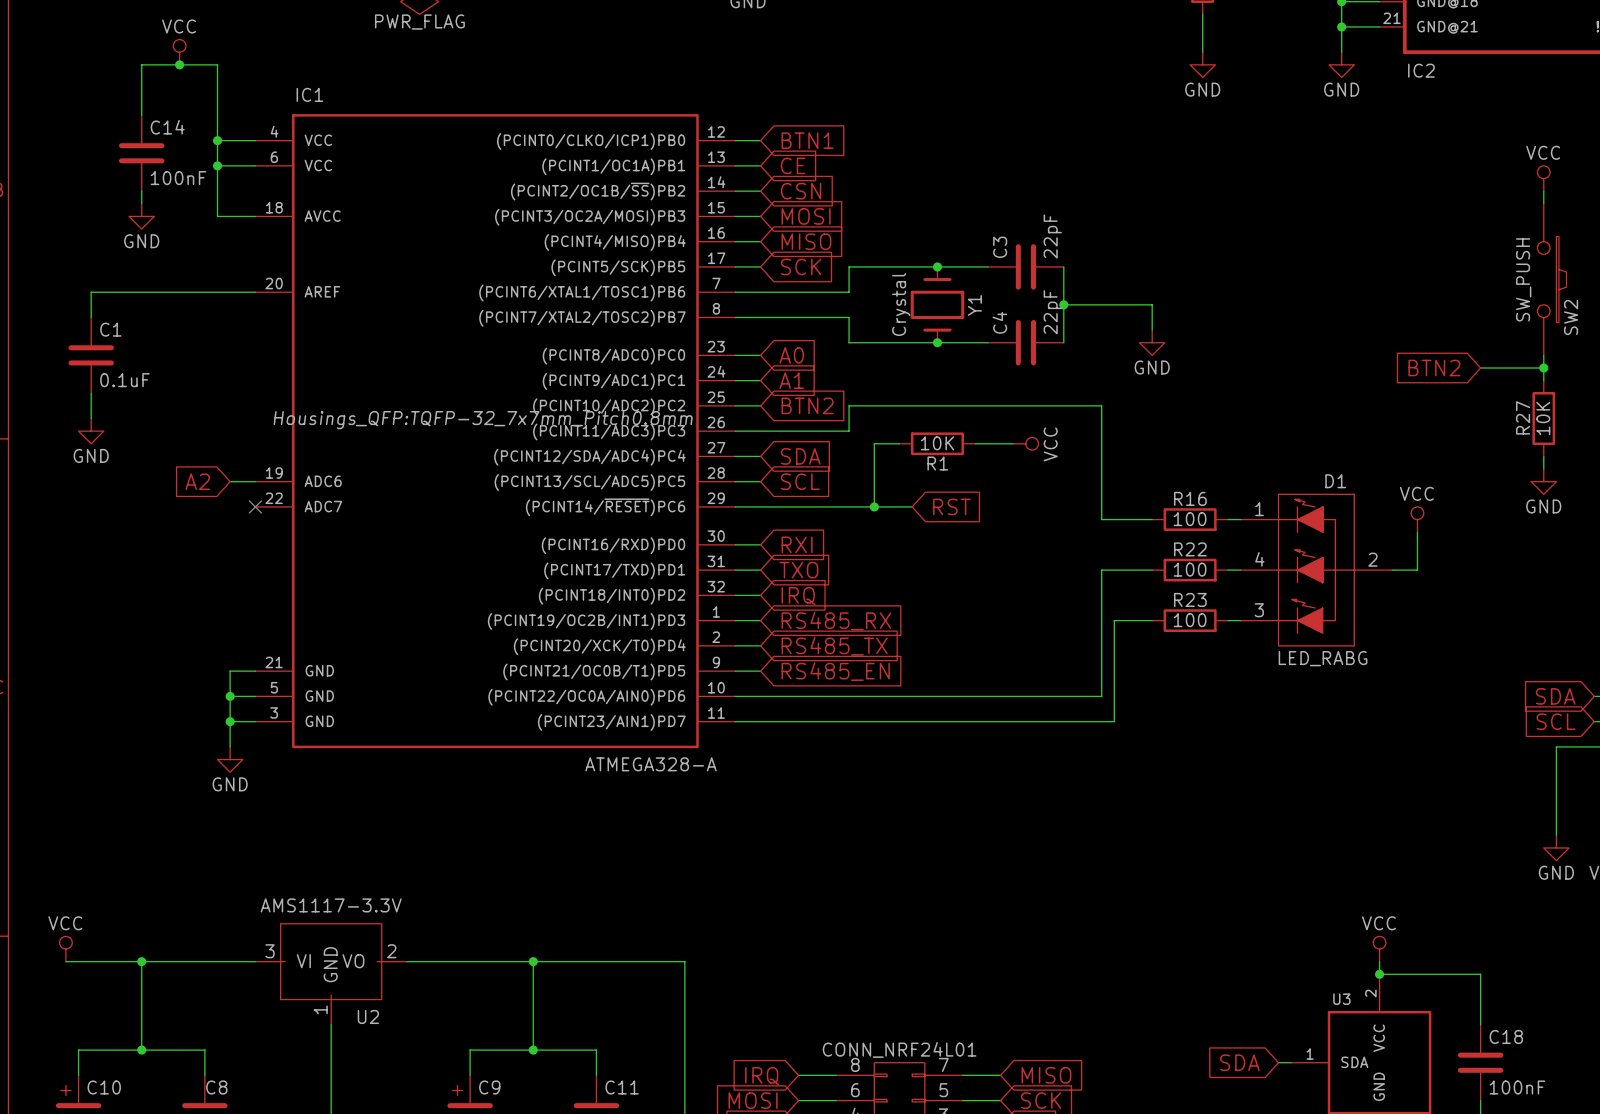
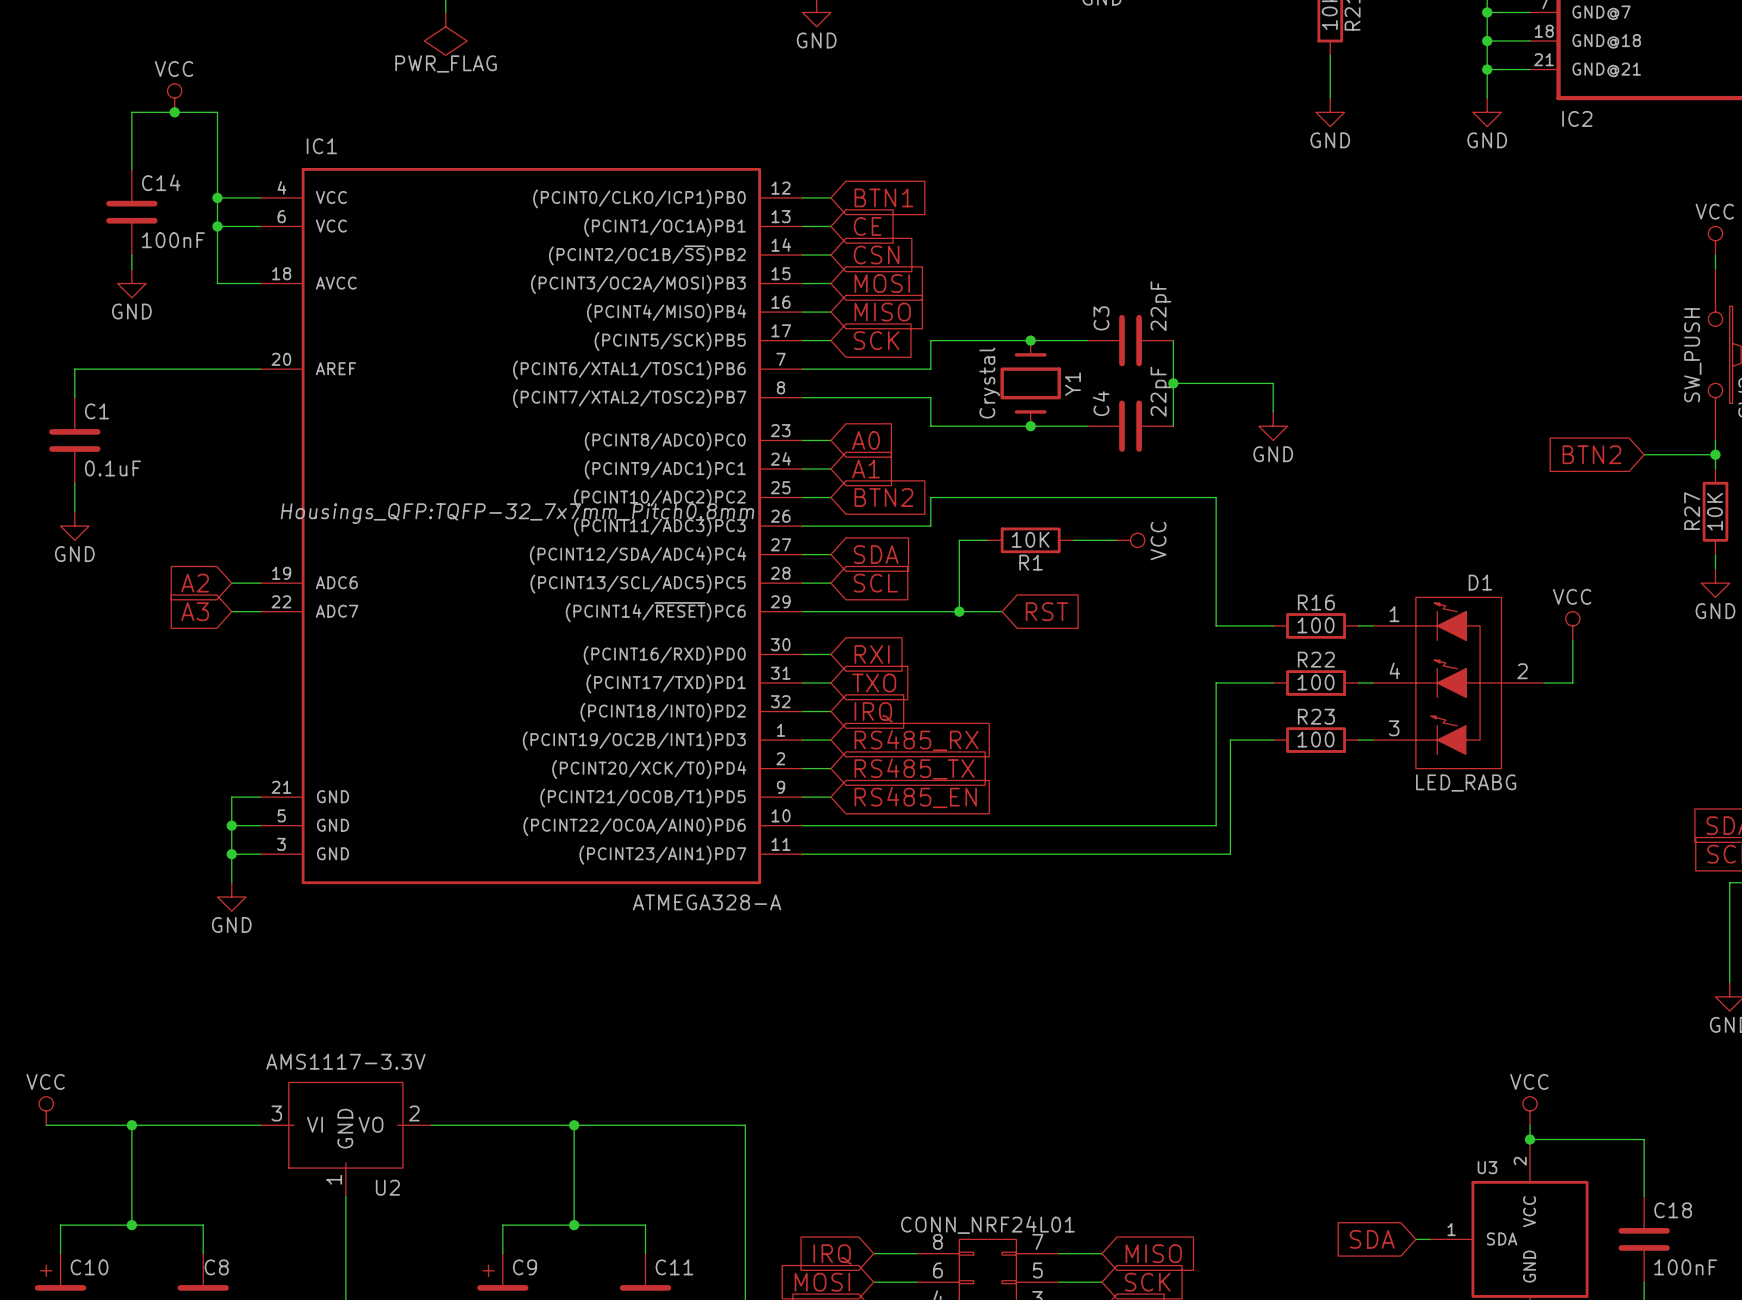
global label: none -> A3 (195, 611)
wire: none -> (231, 611) (260, 611)
no-connect mark: (255, 506) -> none

